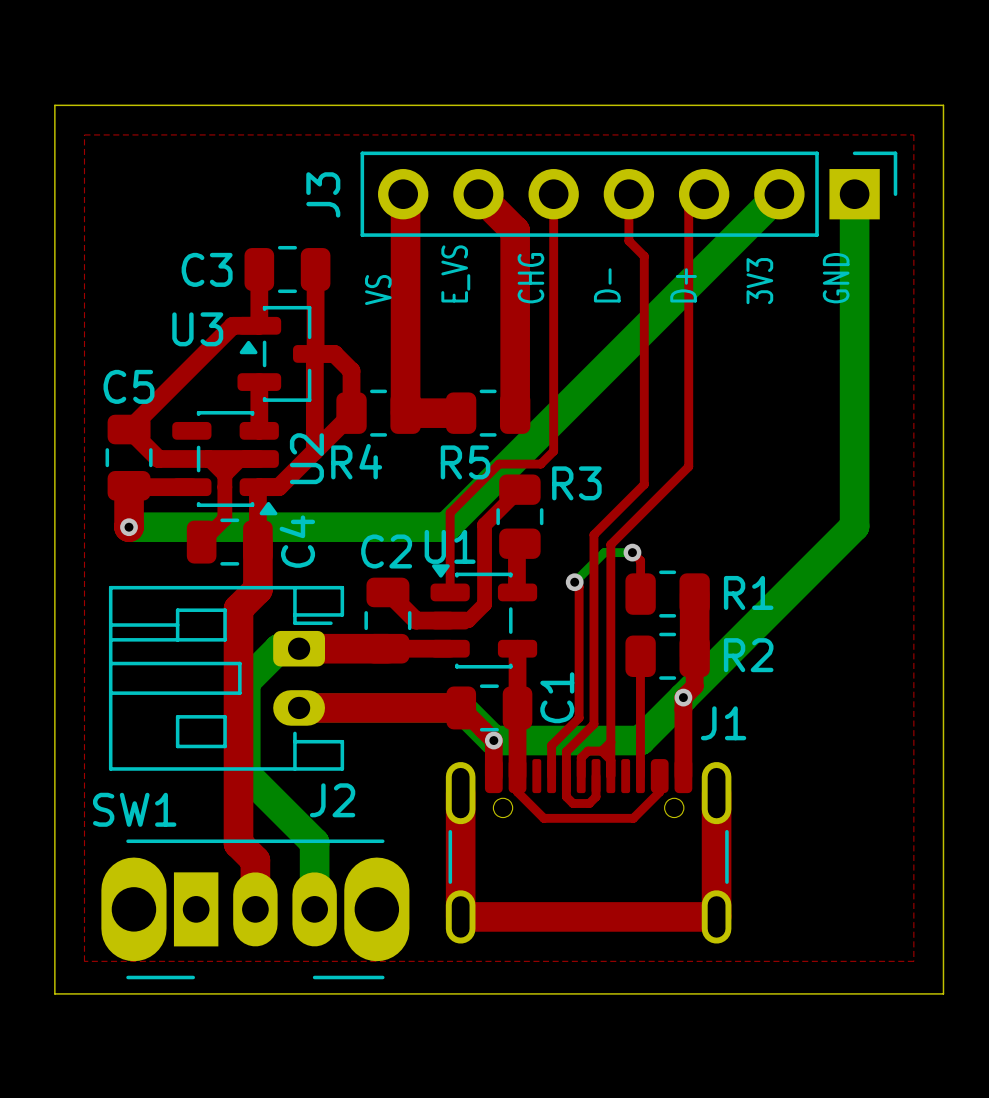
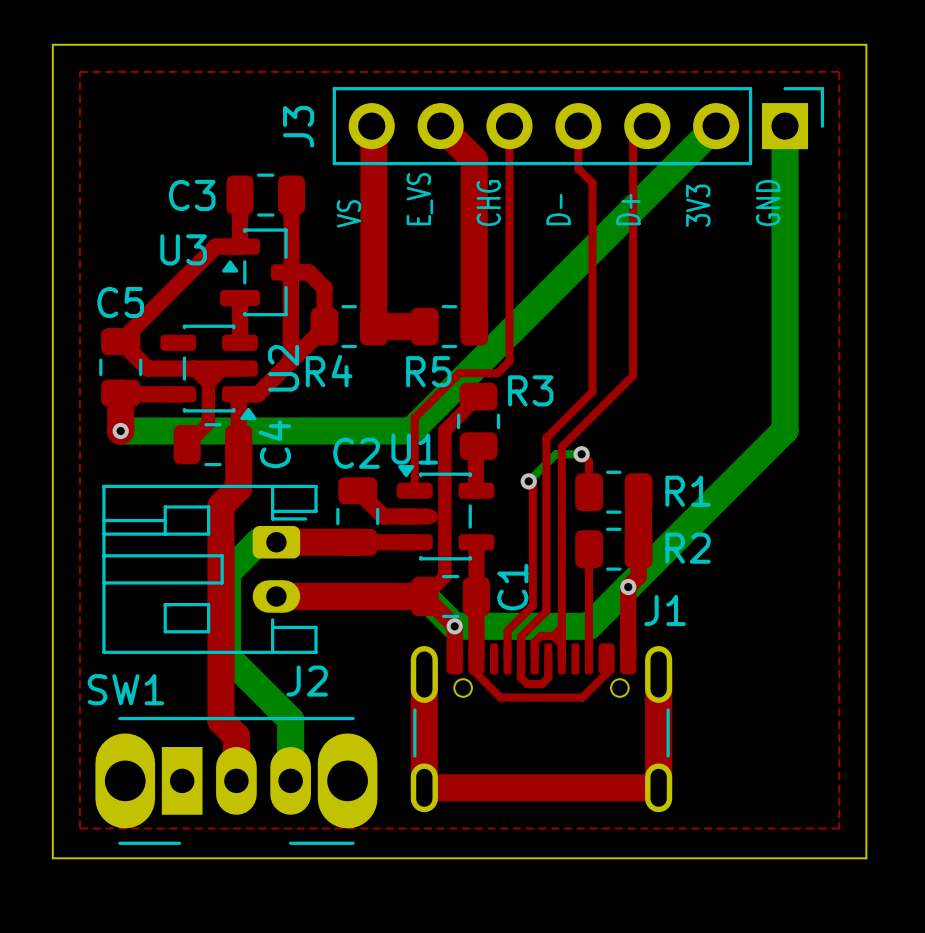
top track: (484, 525) (484, 604) (468, 620) -> (446, 429) (444, 576) (424, 596)

